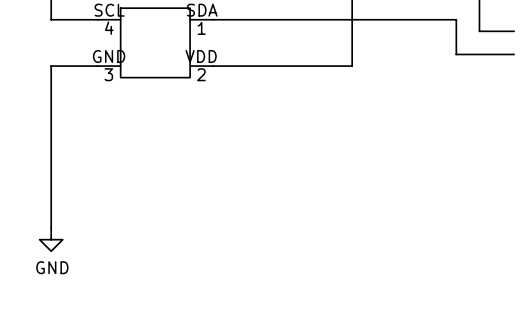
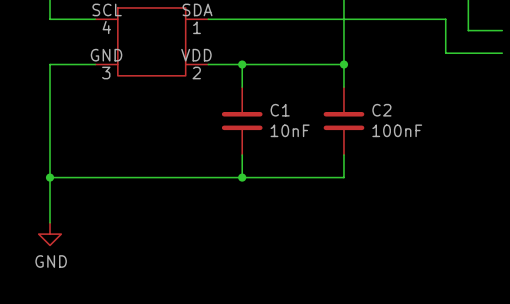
wire: none -> (242, 64) (242, 87)
junction: none -> (242, 64)
wire: none -> (343, 64) (343, 87)
junction: none -> (343, 64)
C1: none -> 10nF (242, 121)
C2: none -> 100nF (343, 121)
wire: none -> (242, 154) (242, 177)
wire: none -> (343, 154) (343, 177) (50, 177)
junction: none -> (50, 177)
junction: none -> (242, 177)

